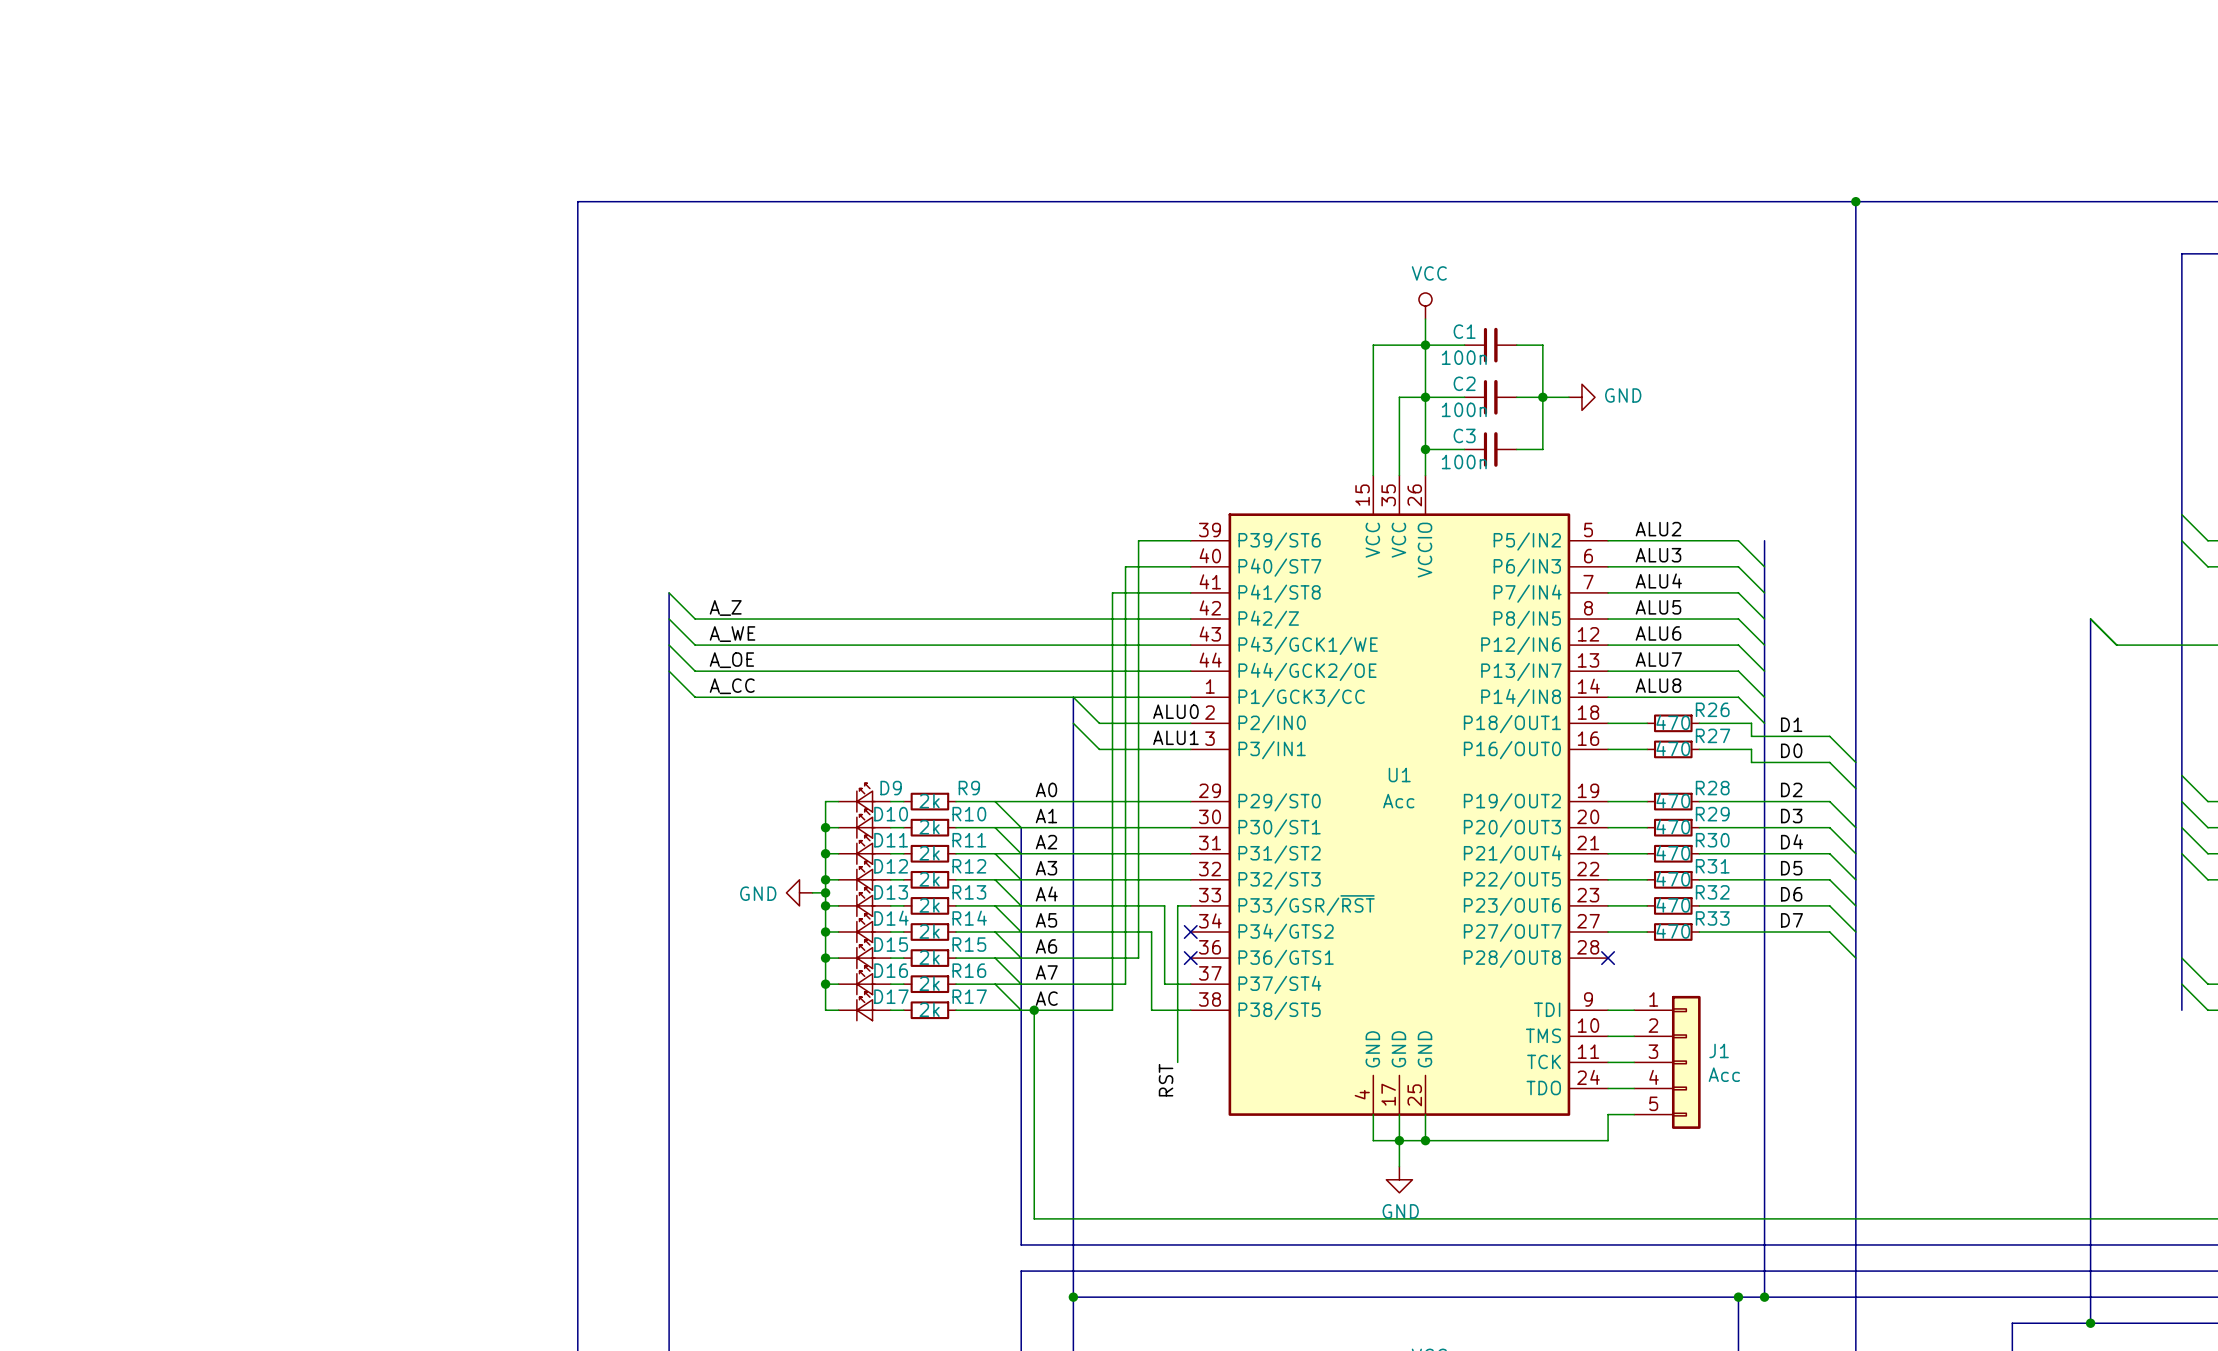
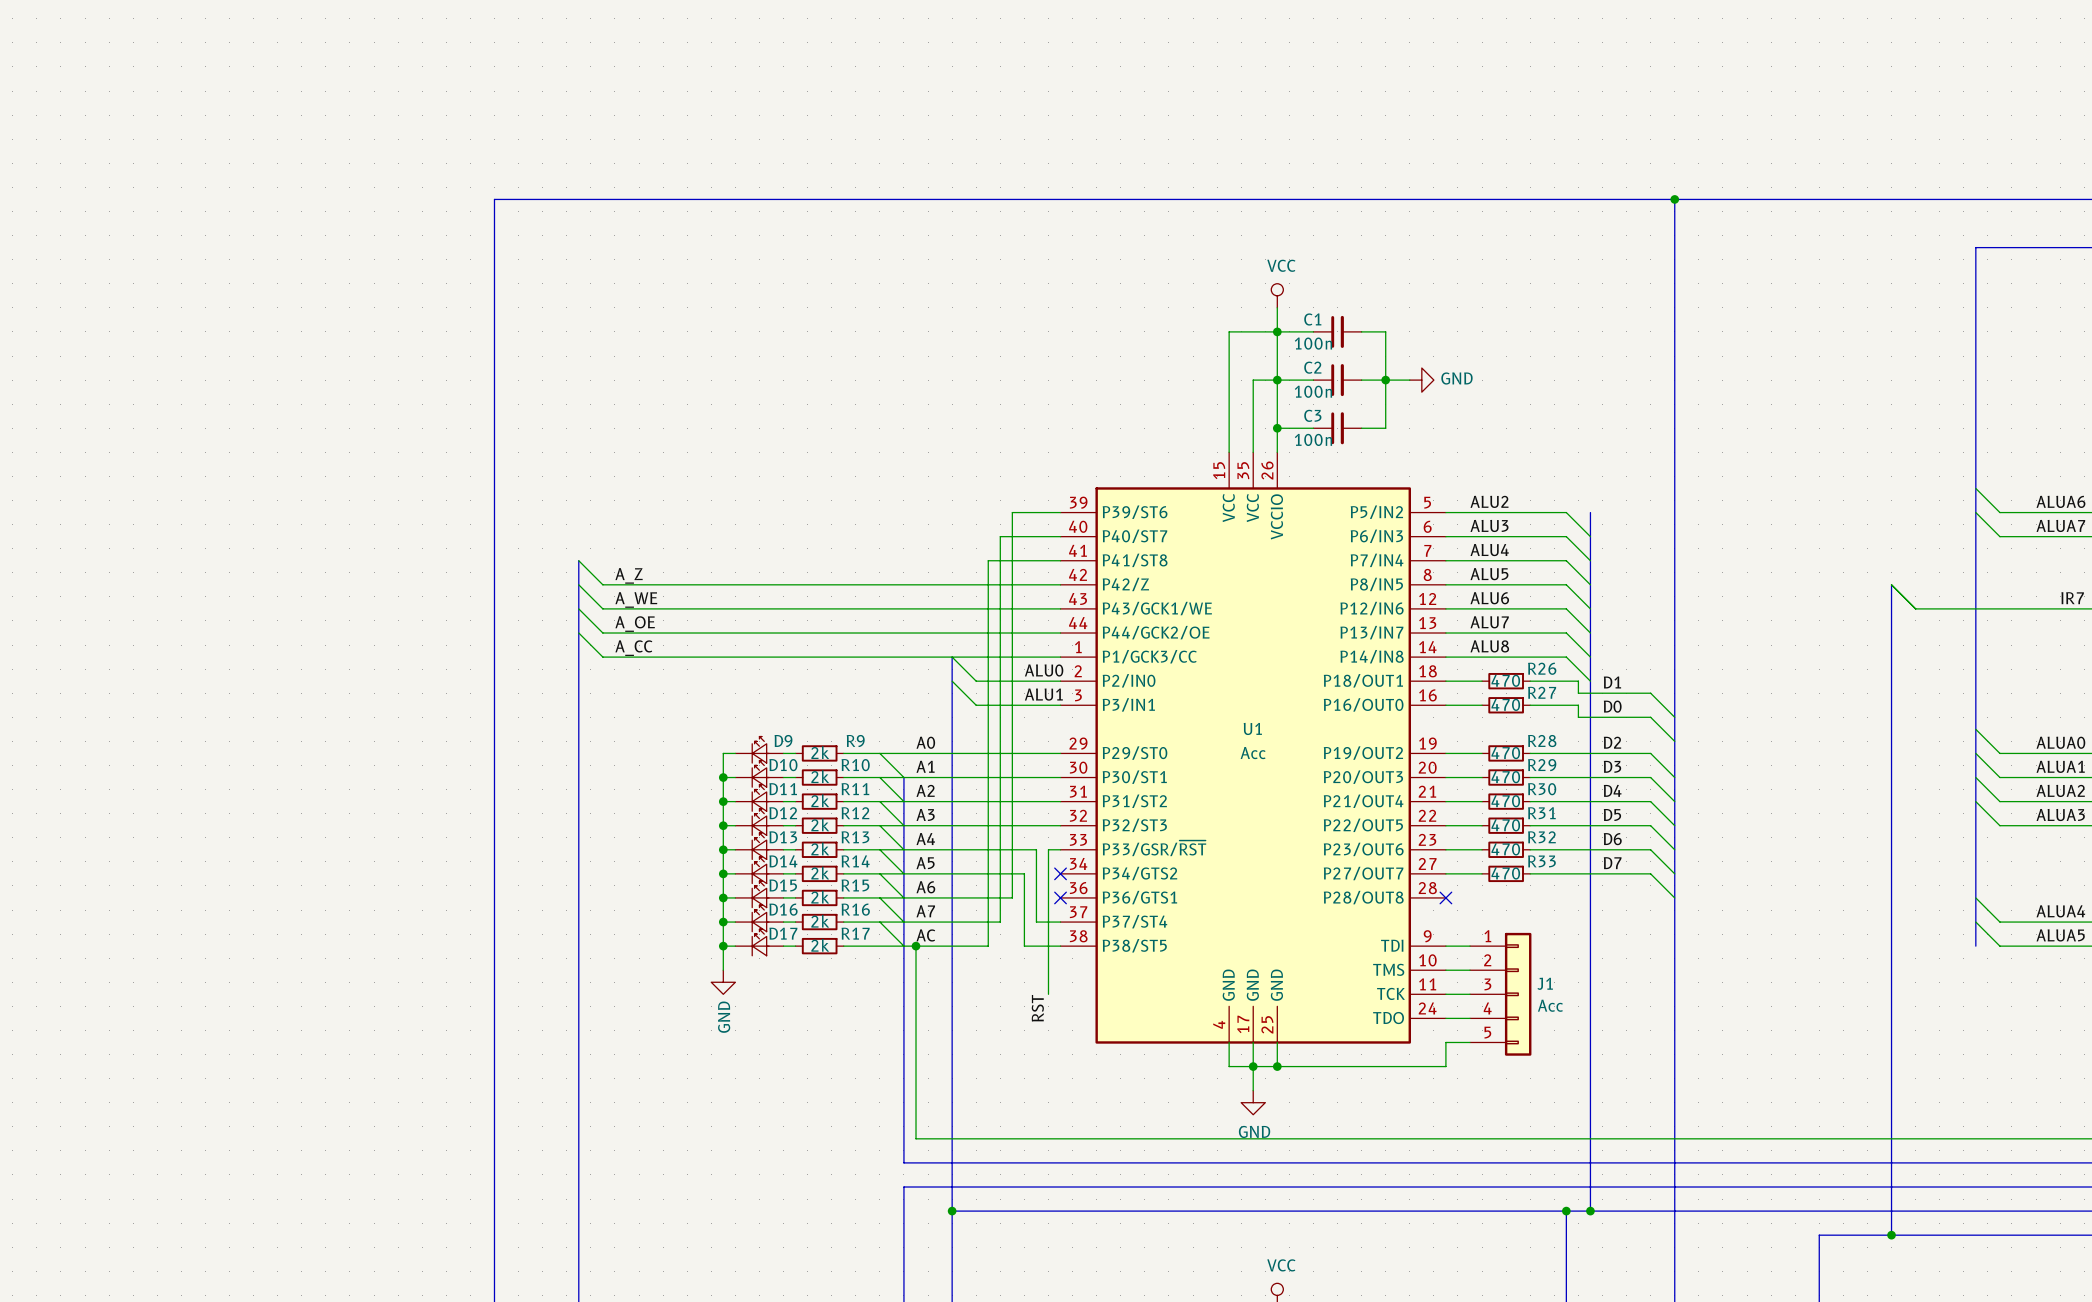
power symbol rotation: 0° (799, 892) -> 90° counterclockwise (723, 982)
power symbol position: GND (799, 892) -> GND (723, 982)
wire: (812, 892) (825, 892) -> none
junction: (825, 892) -> none
wire: none -> (723, 946) (723, 970)
junction: none -> (723, 946)

